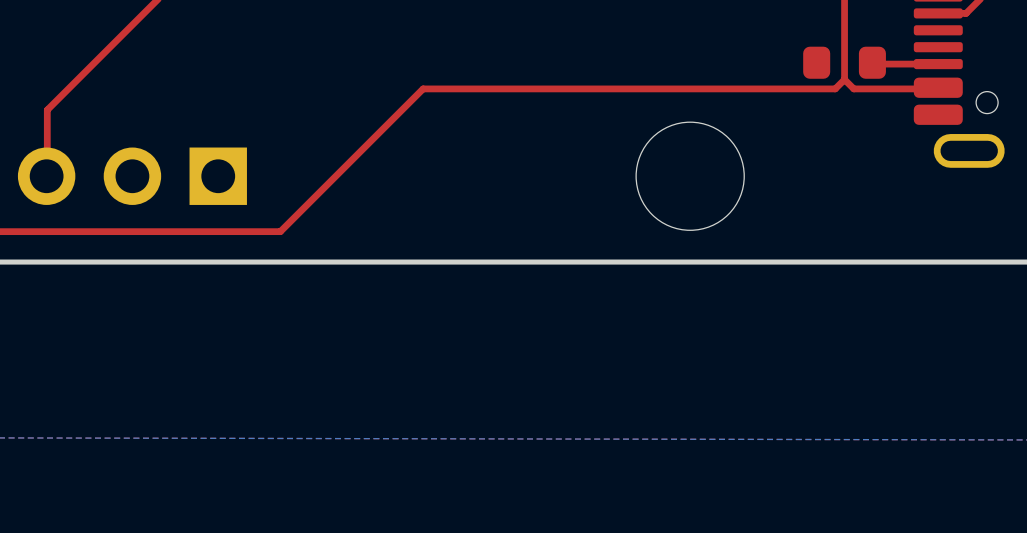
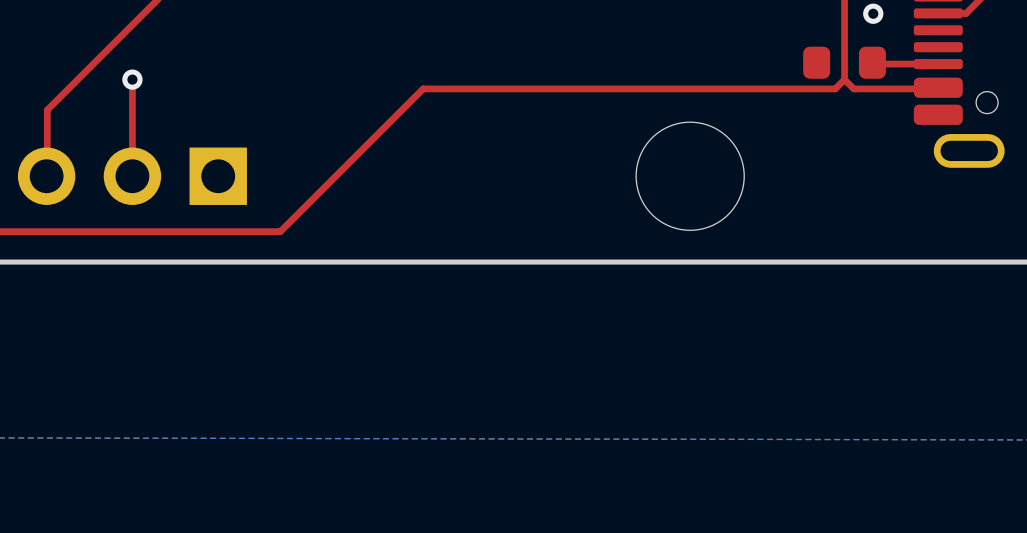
via: none -> (873, 13)
top track: none -> (132, 79) (132, 176)
via: none -> (132, 79)

